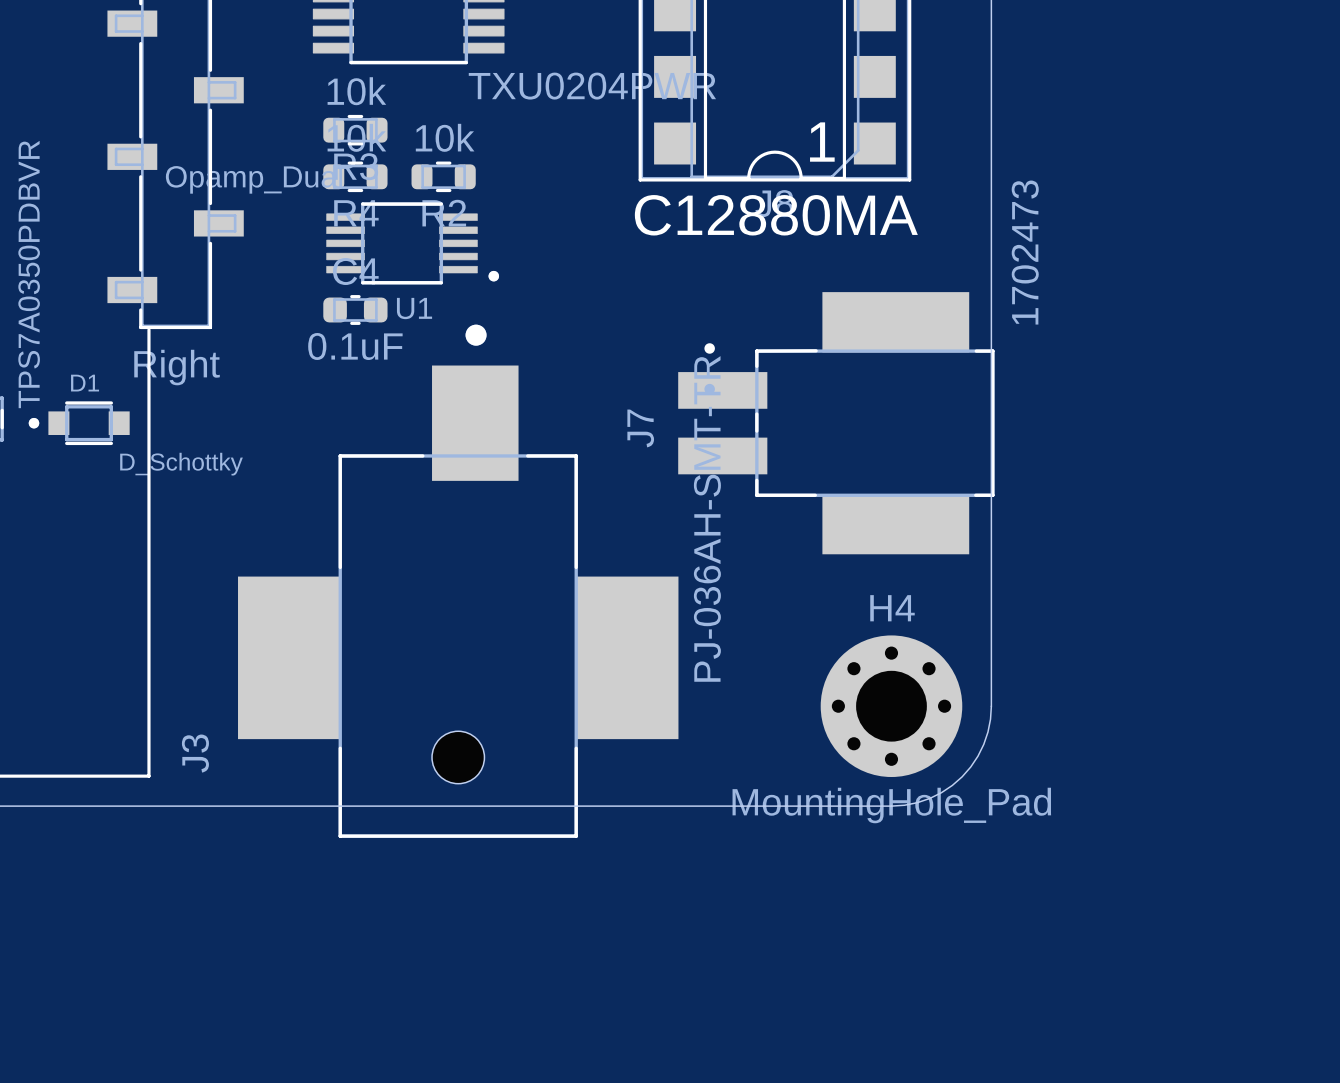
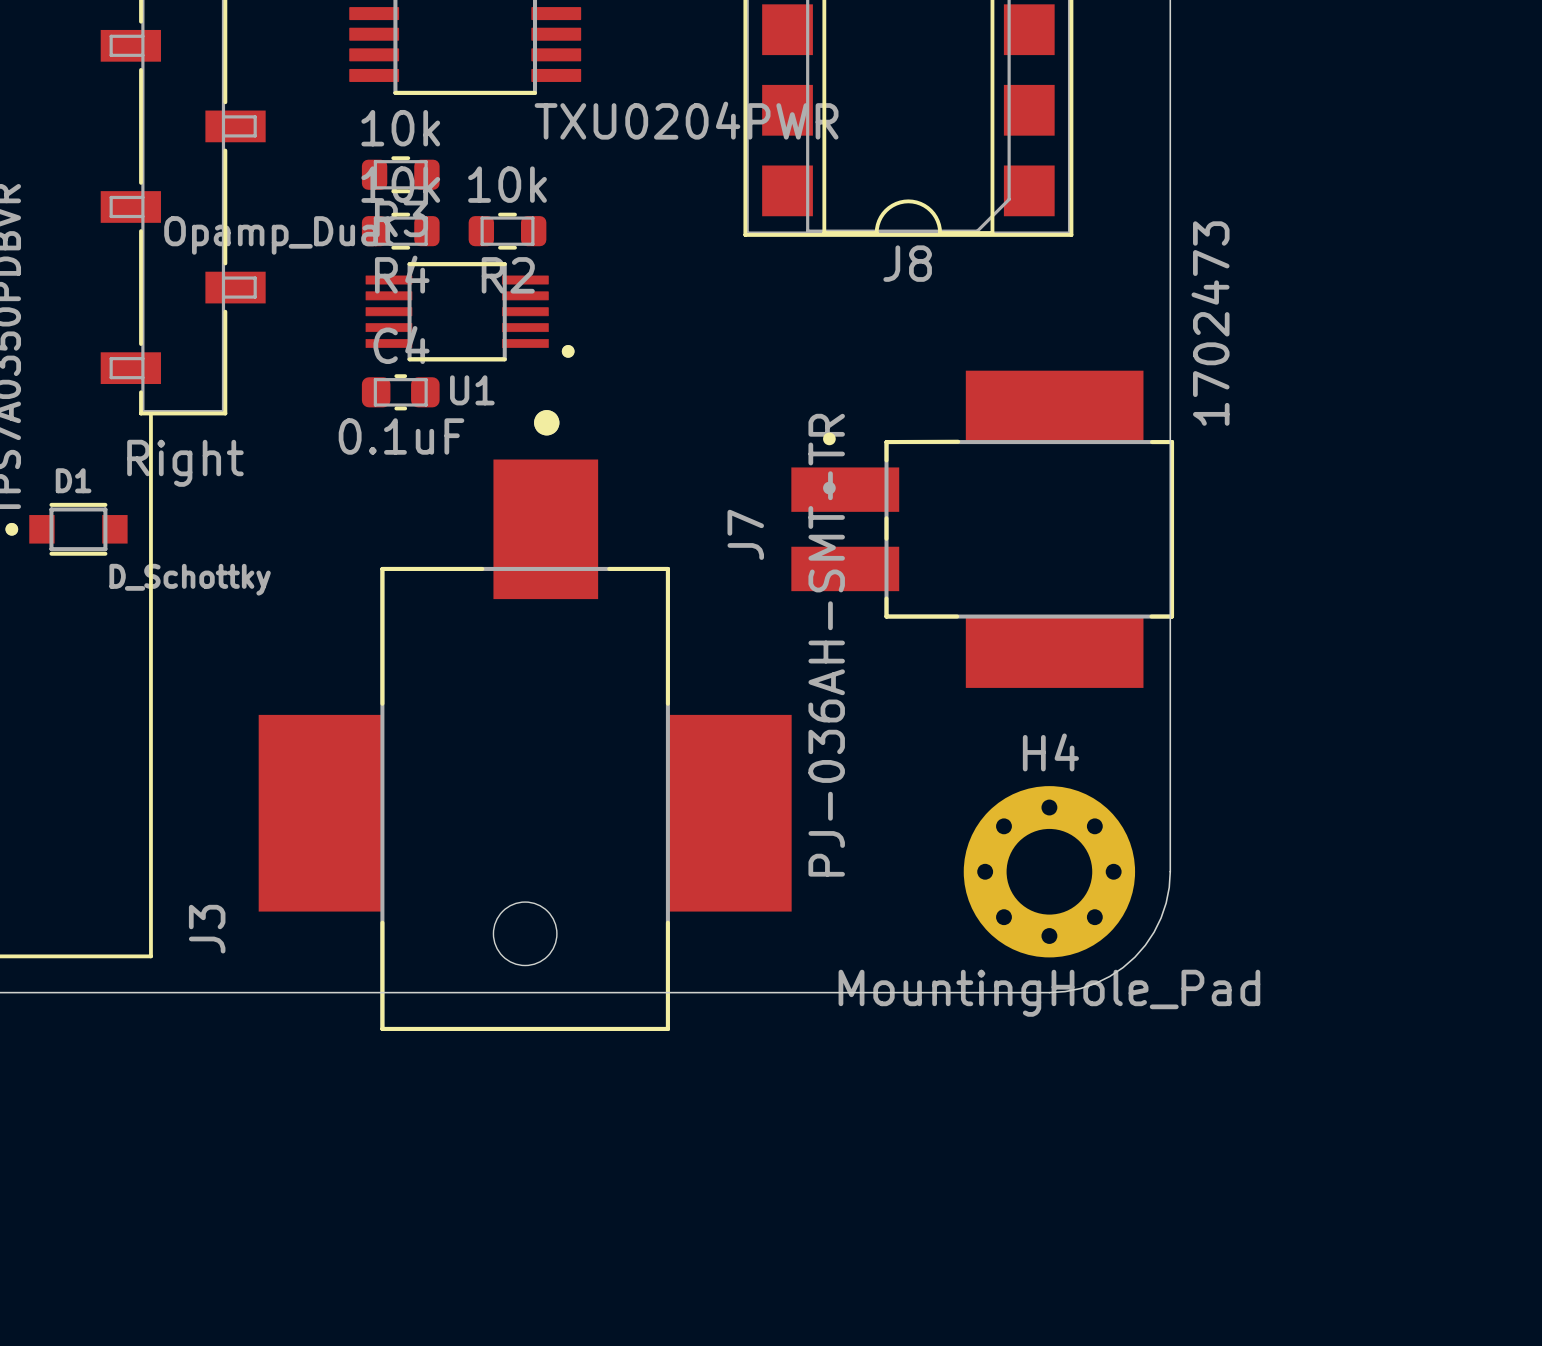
text: 1 (822, 142) -> none
text: C12880MA (776, 215) -> none

